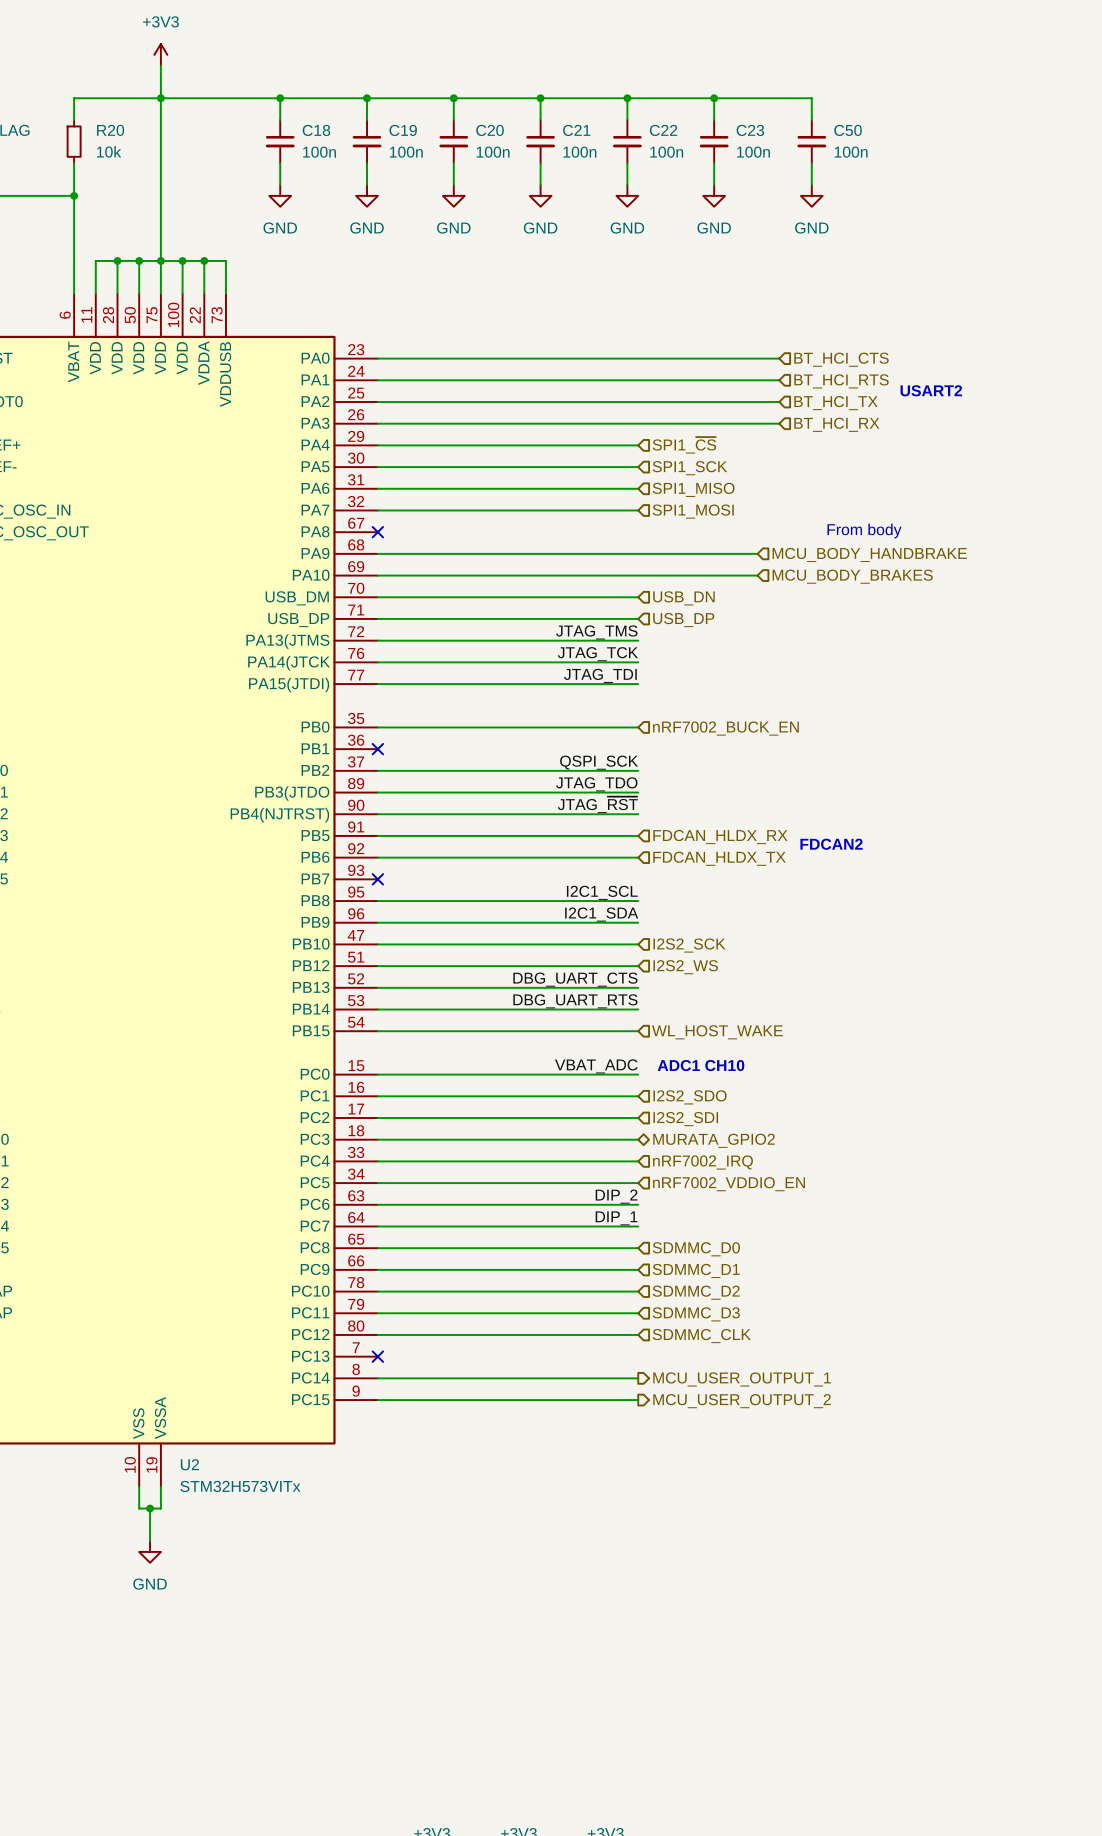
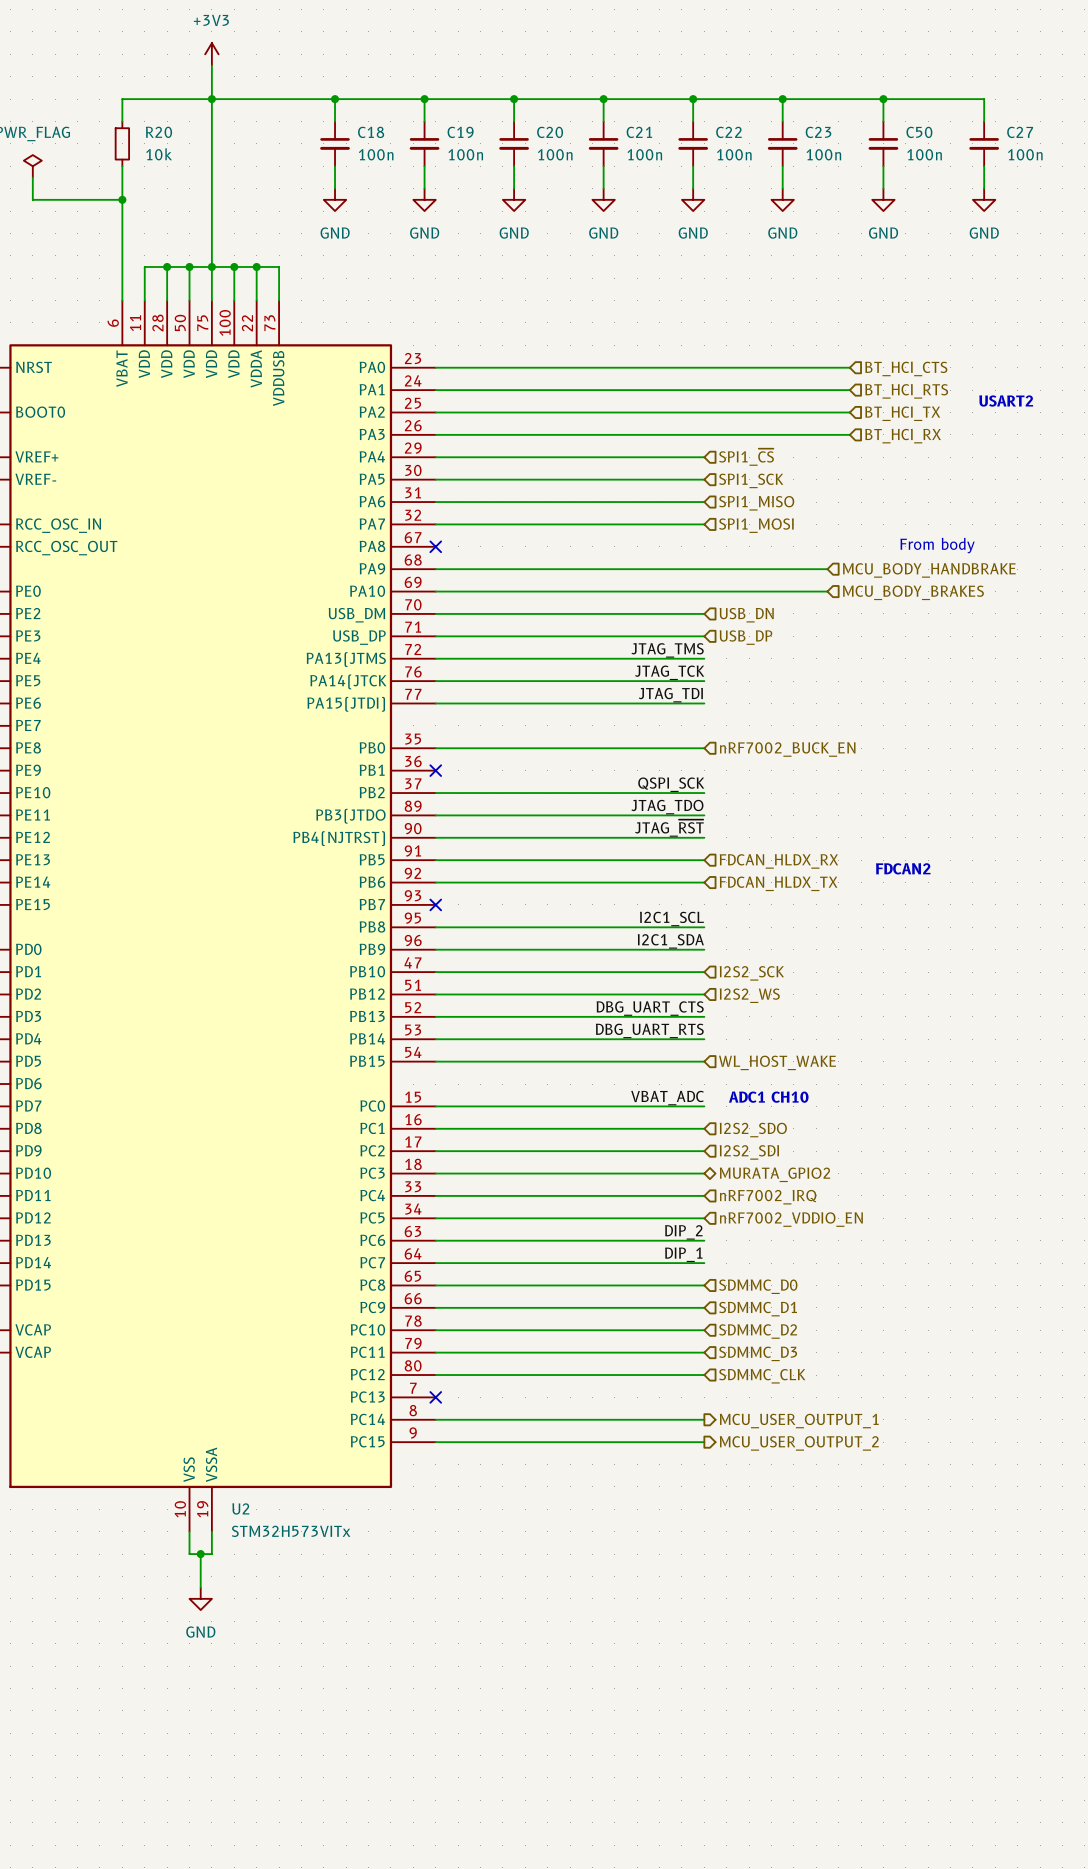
wire: none -> (883, 99) (984, 99) (984, 121)
junction: none -> (883, 99)
C27: none -> 100n (984, 143)
wire: none -> (984, 166) (984, 188)
power symbol: none -> GND (984, 199)

